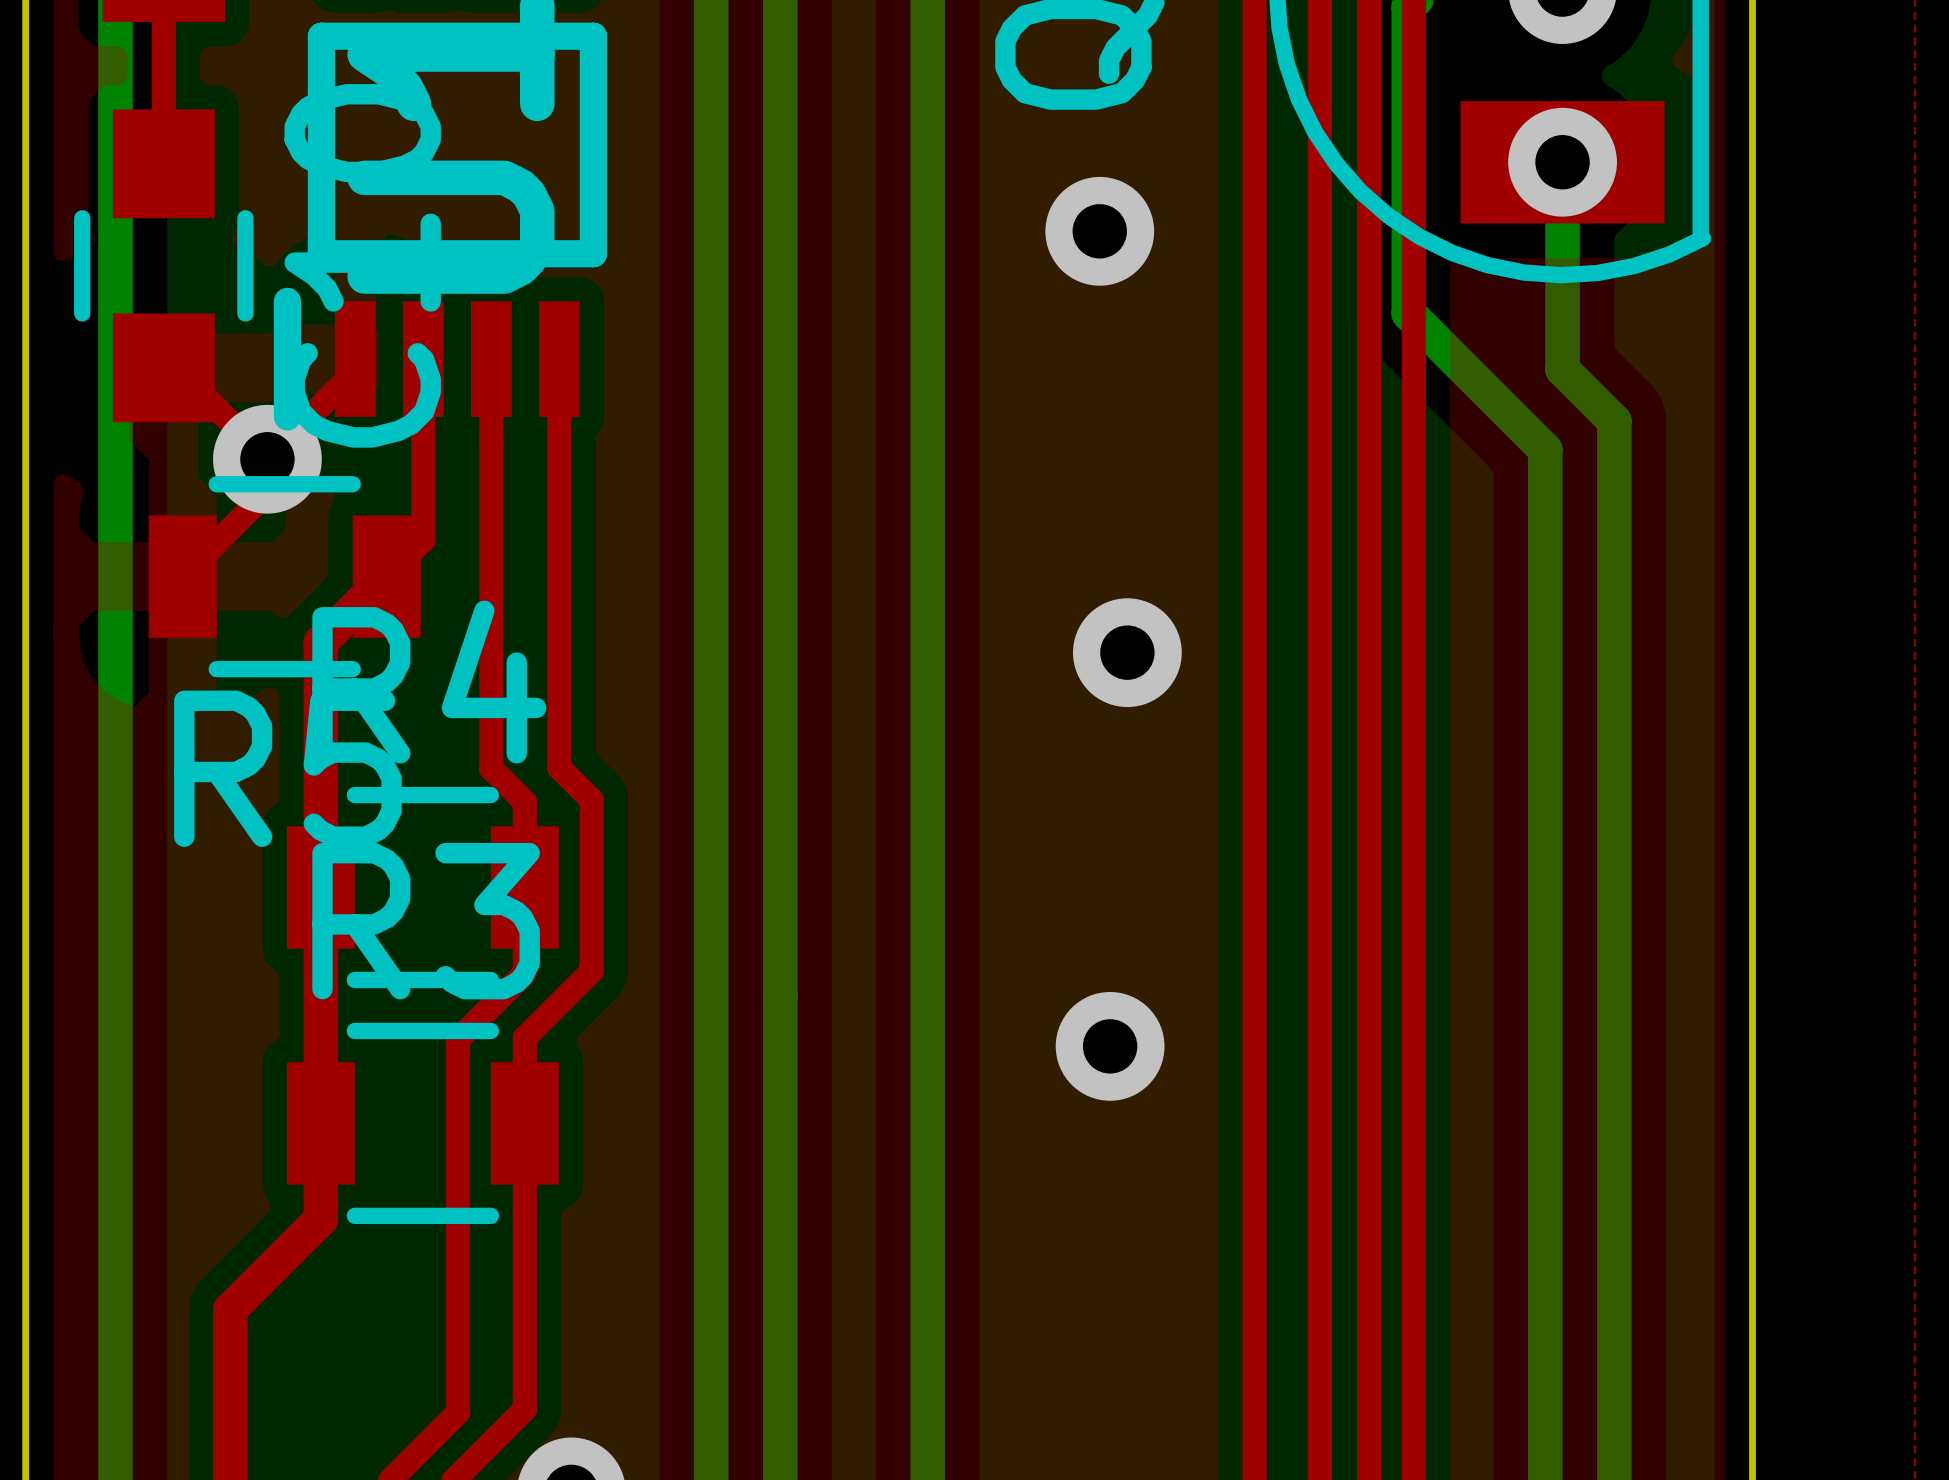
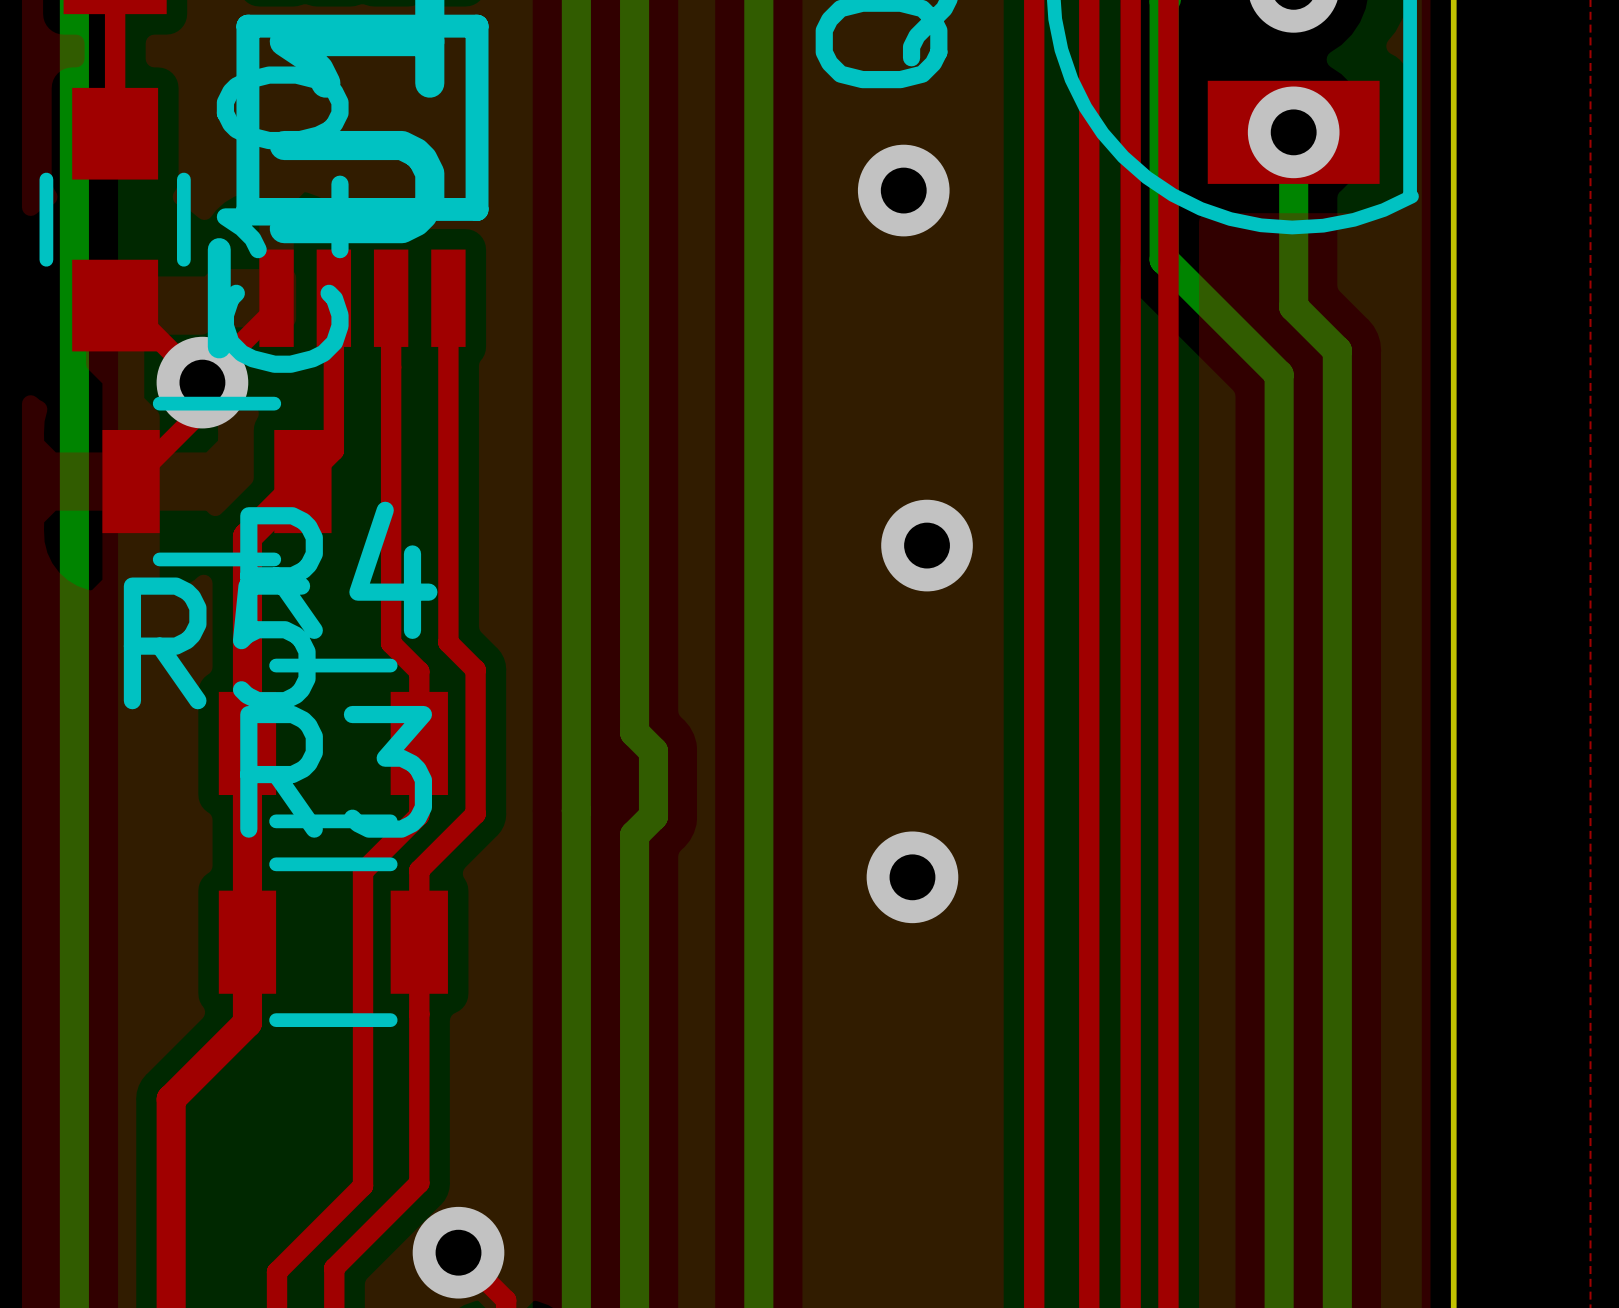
bottom track: (780, 874) (780, 996) -> (634, 732) (653, 751) (653, 816) (634, 835)

